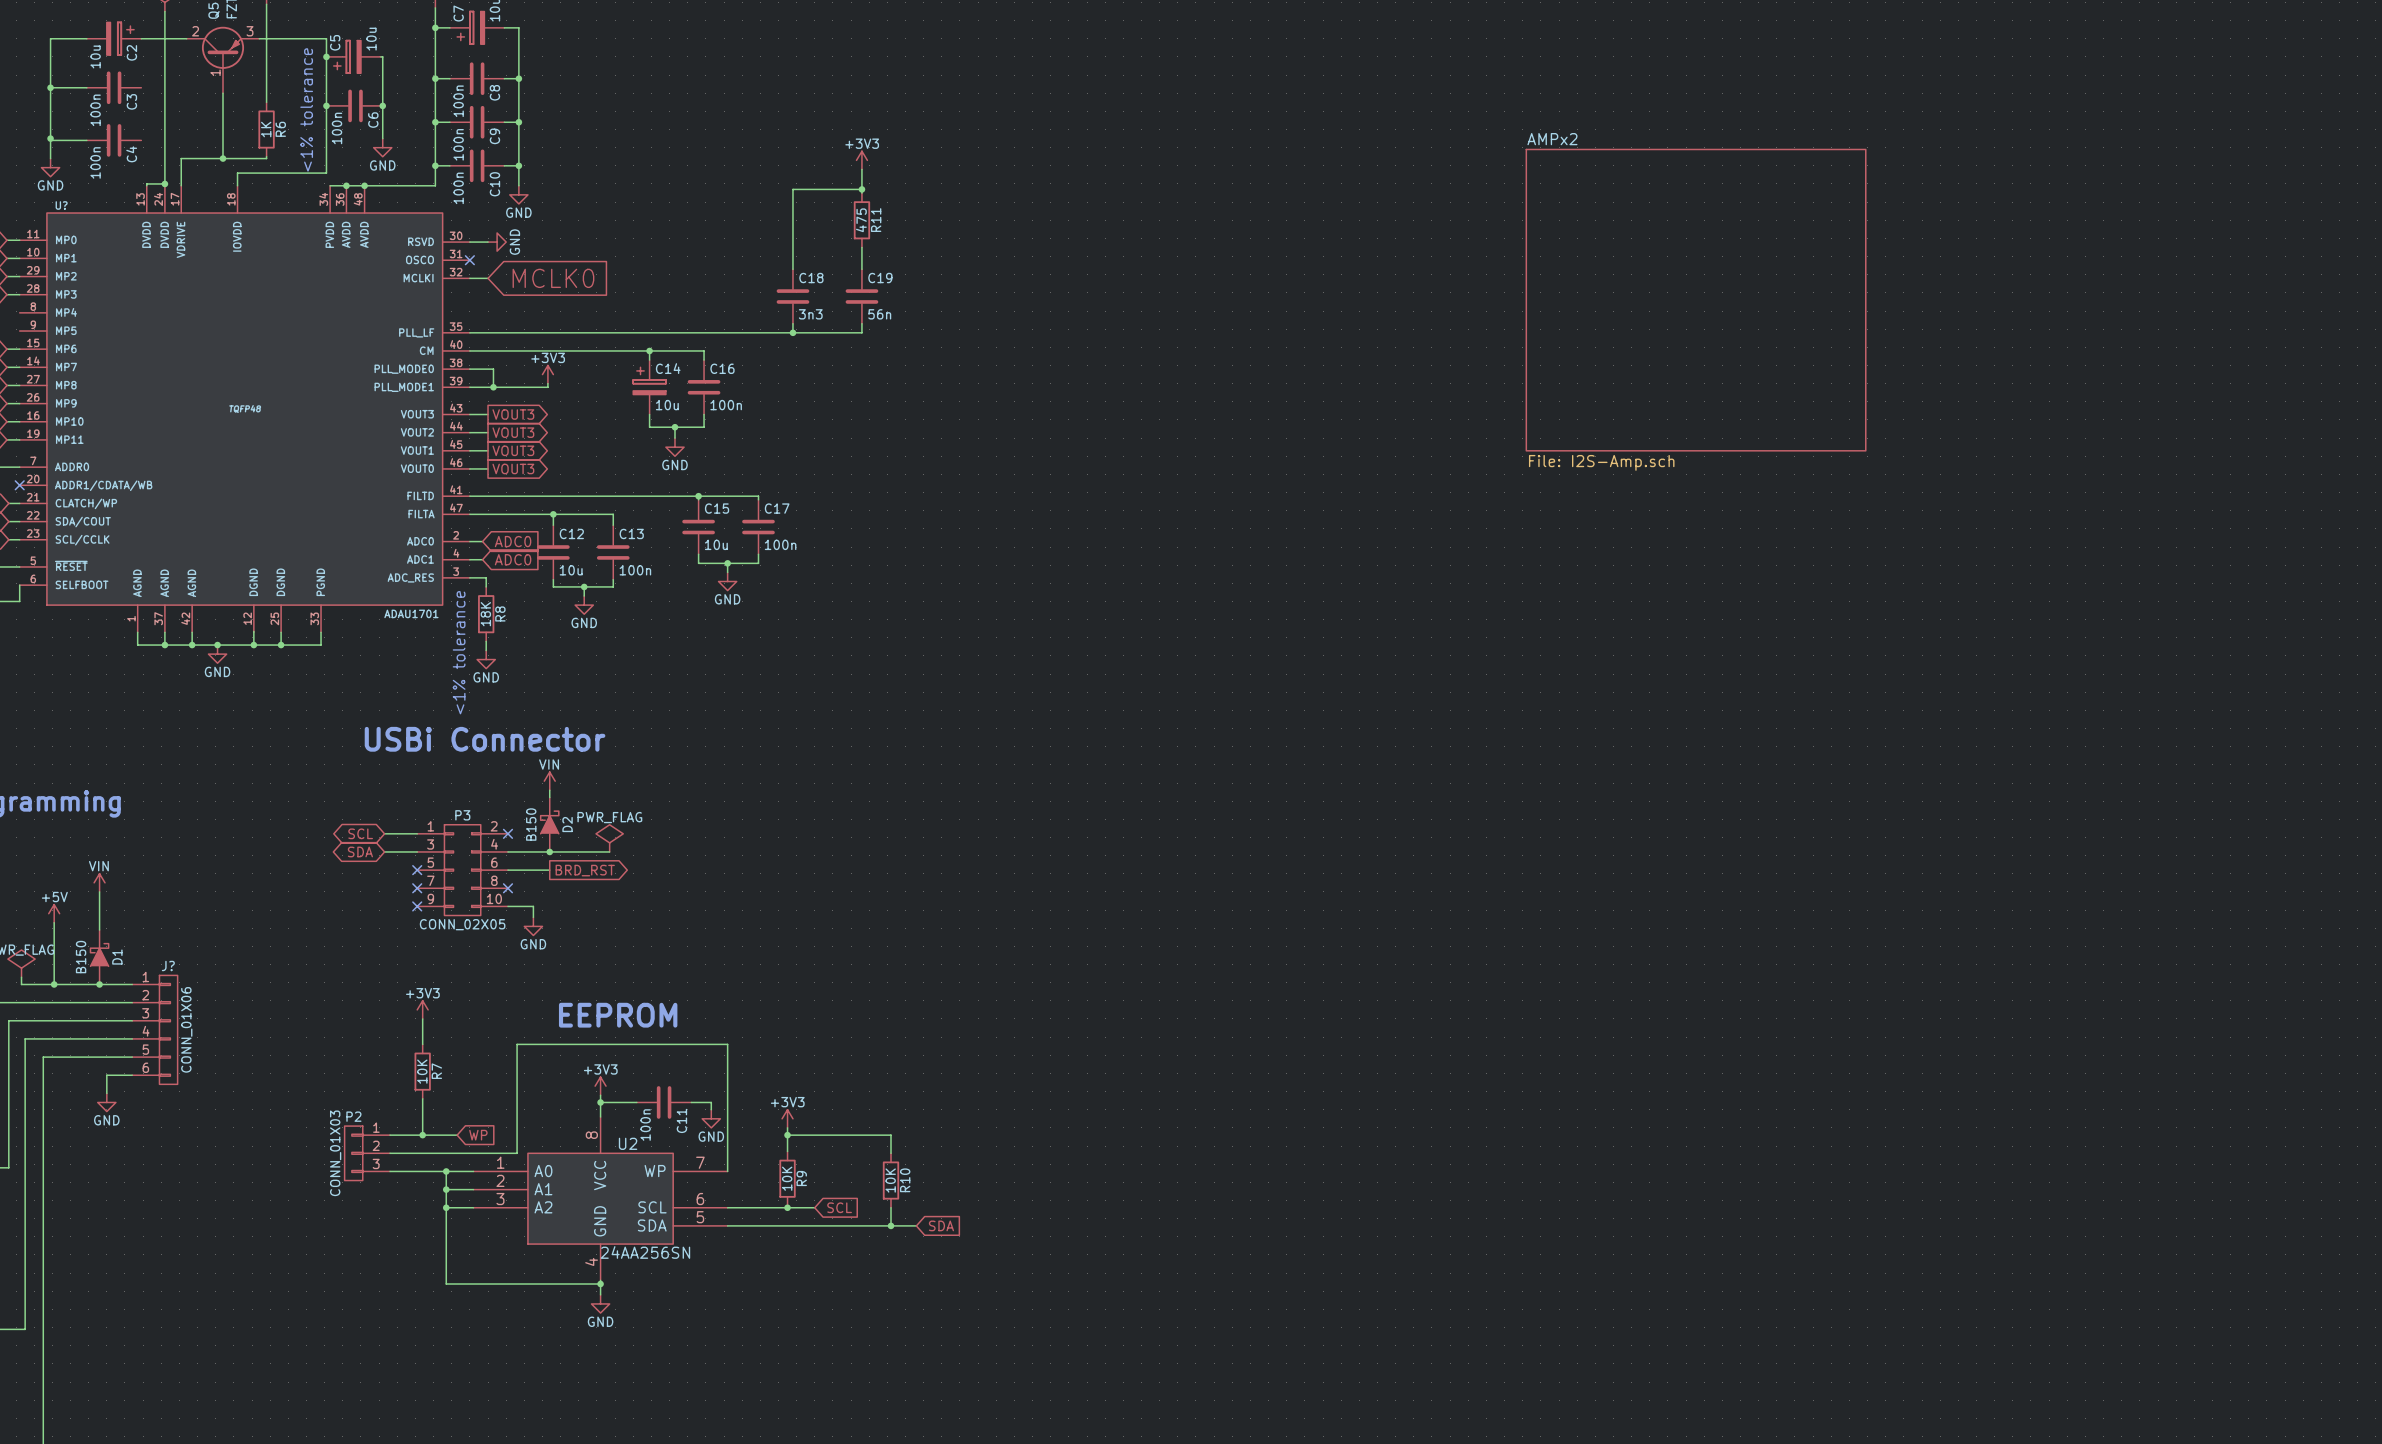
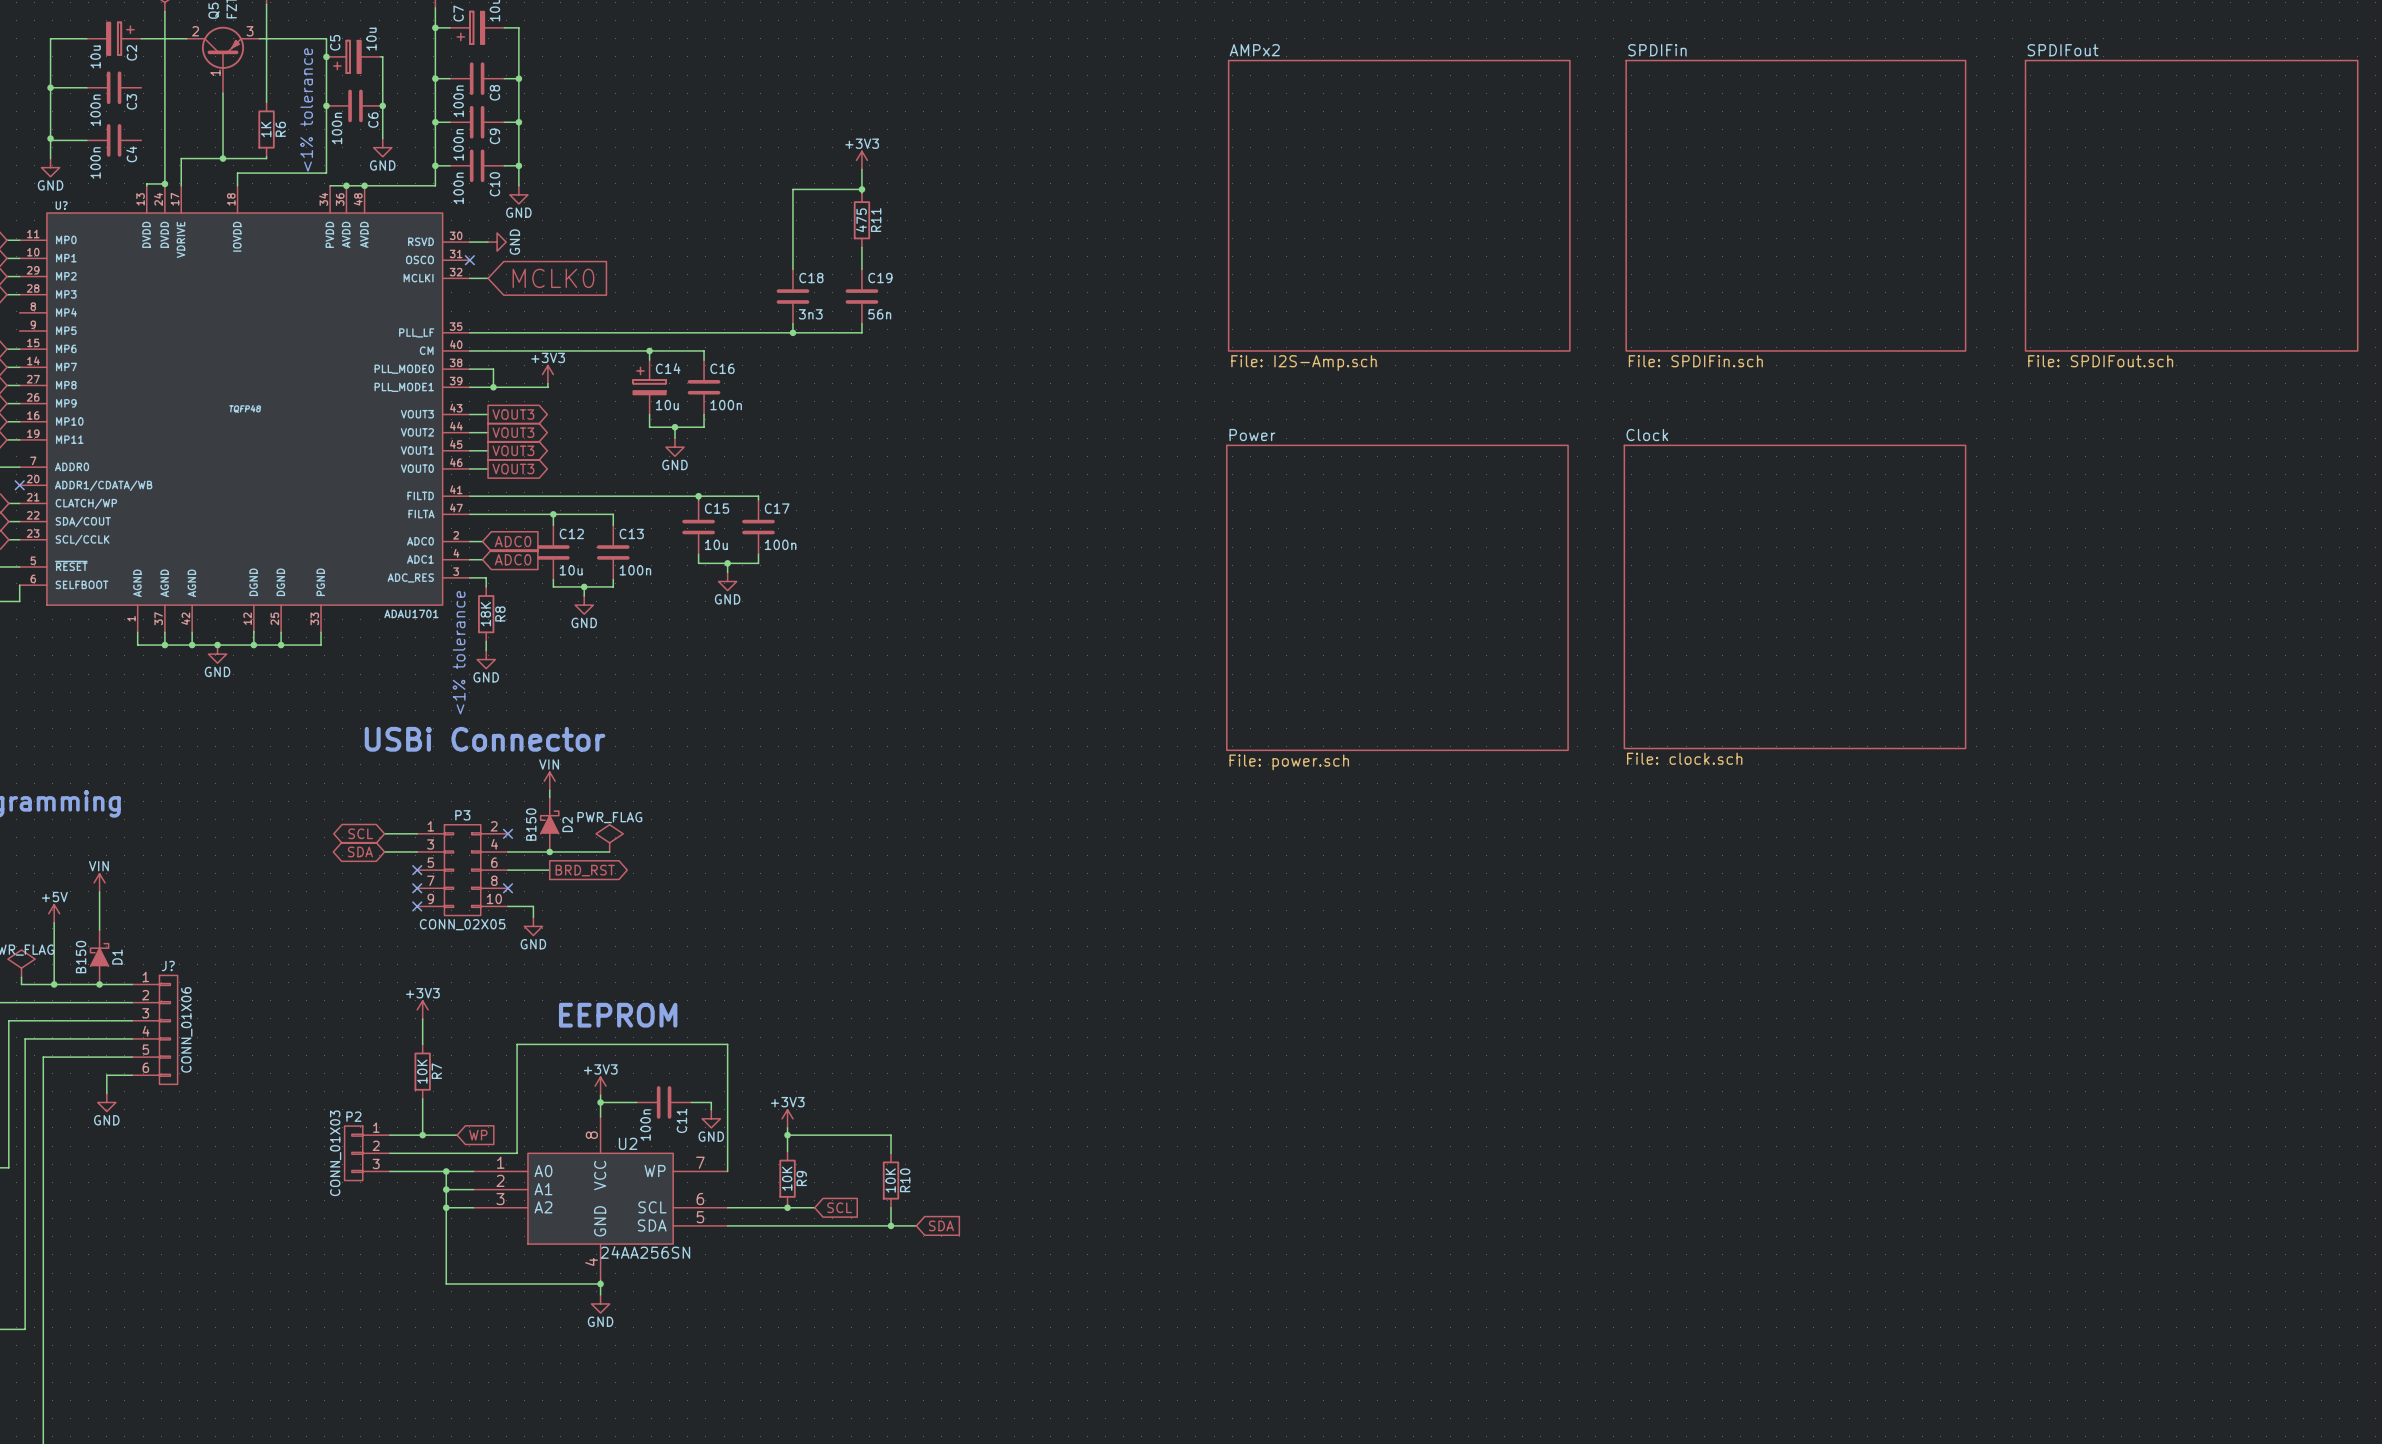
sheet AMPx2 shape: [1526, 149, 1866, 451] -> [1228, 60, 1570, 351]
sheet SPDIFin: none -> File: SPDIFin.sch (1795, 205)
sheet SPDIFout: none -> File: SPDIFout.sch (2191, 205)
sheet Clock: none -> File: clock.sch (1794, 596)
sheet Power: none -> File: power.sch (1397, 597)

